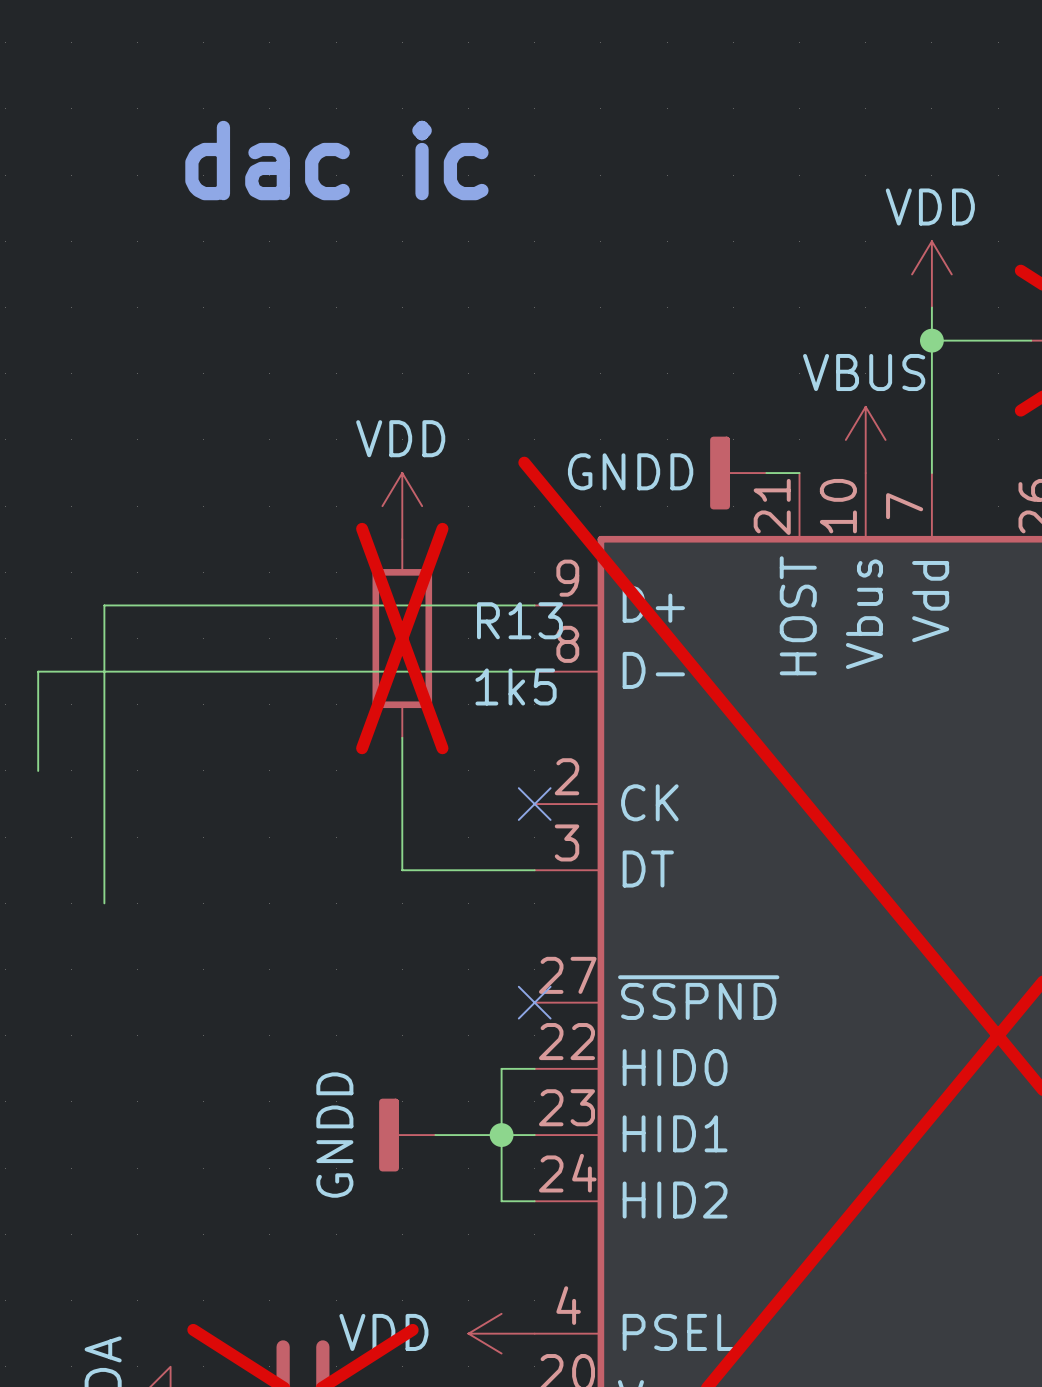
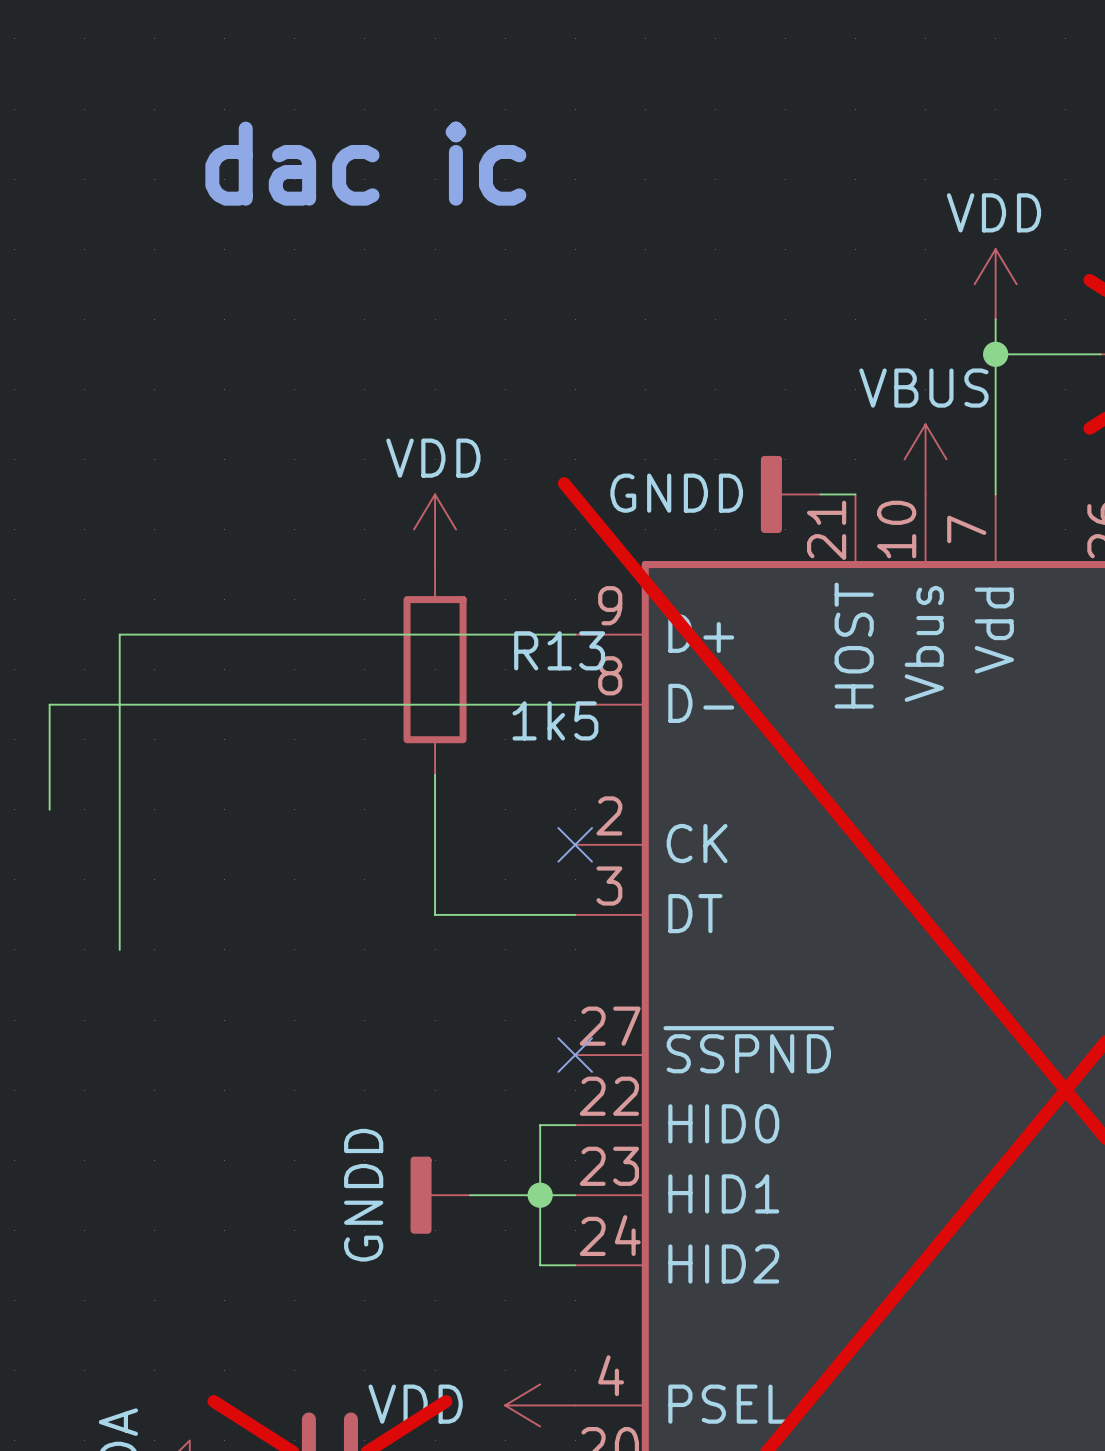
R13 do-not-place cross: (402, 638) -> none

